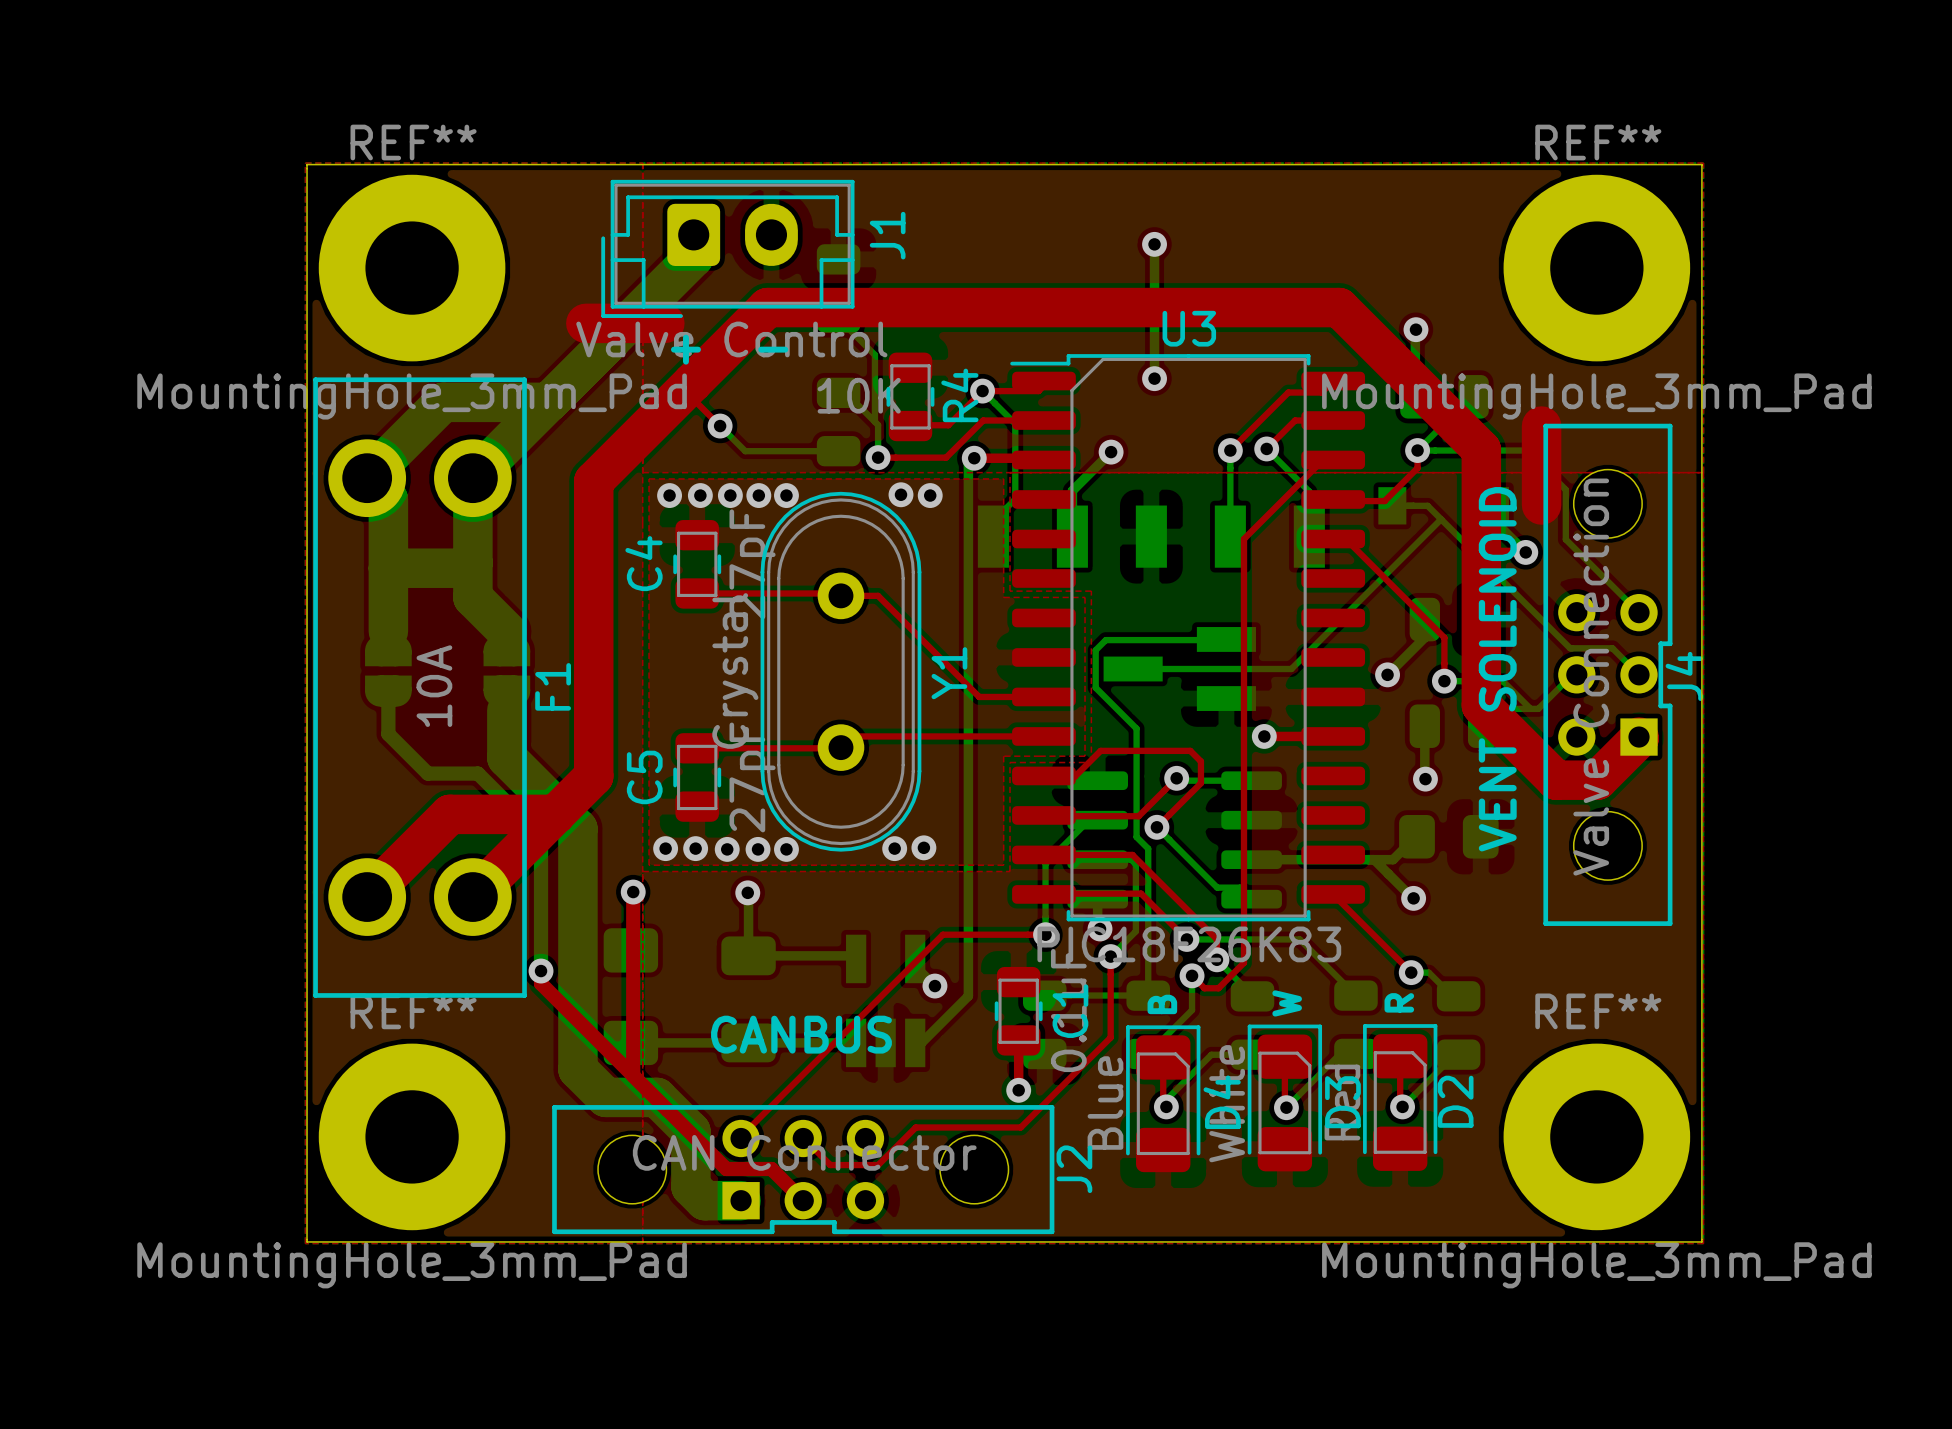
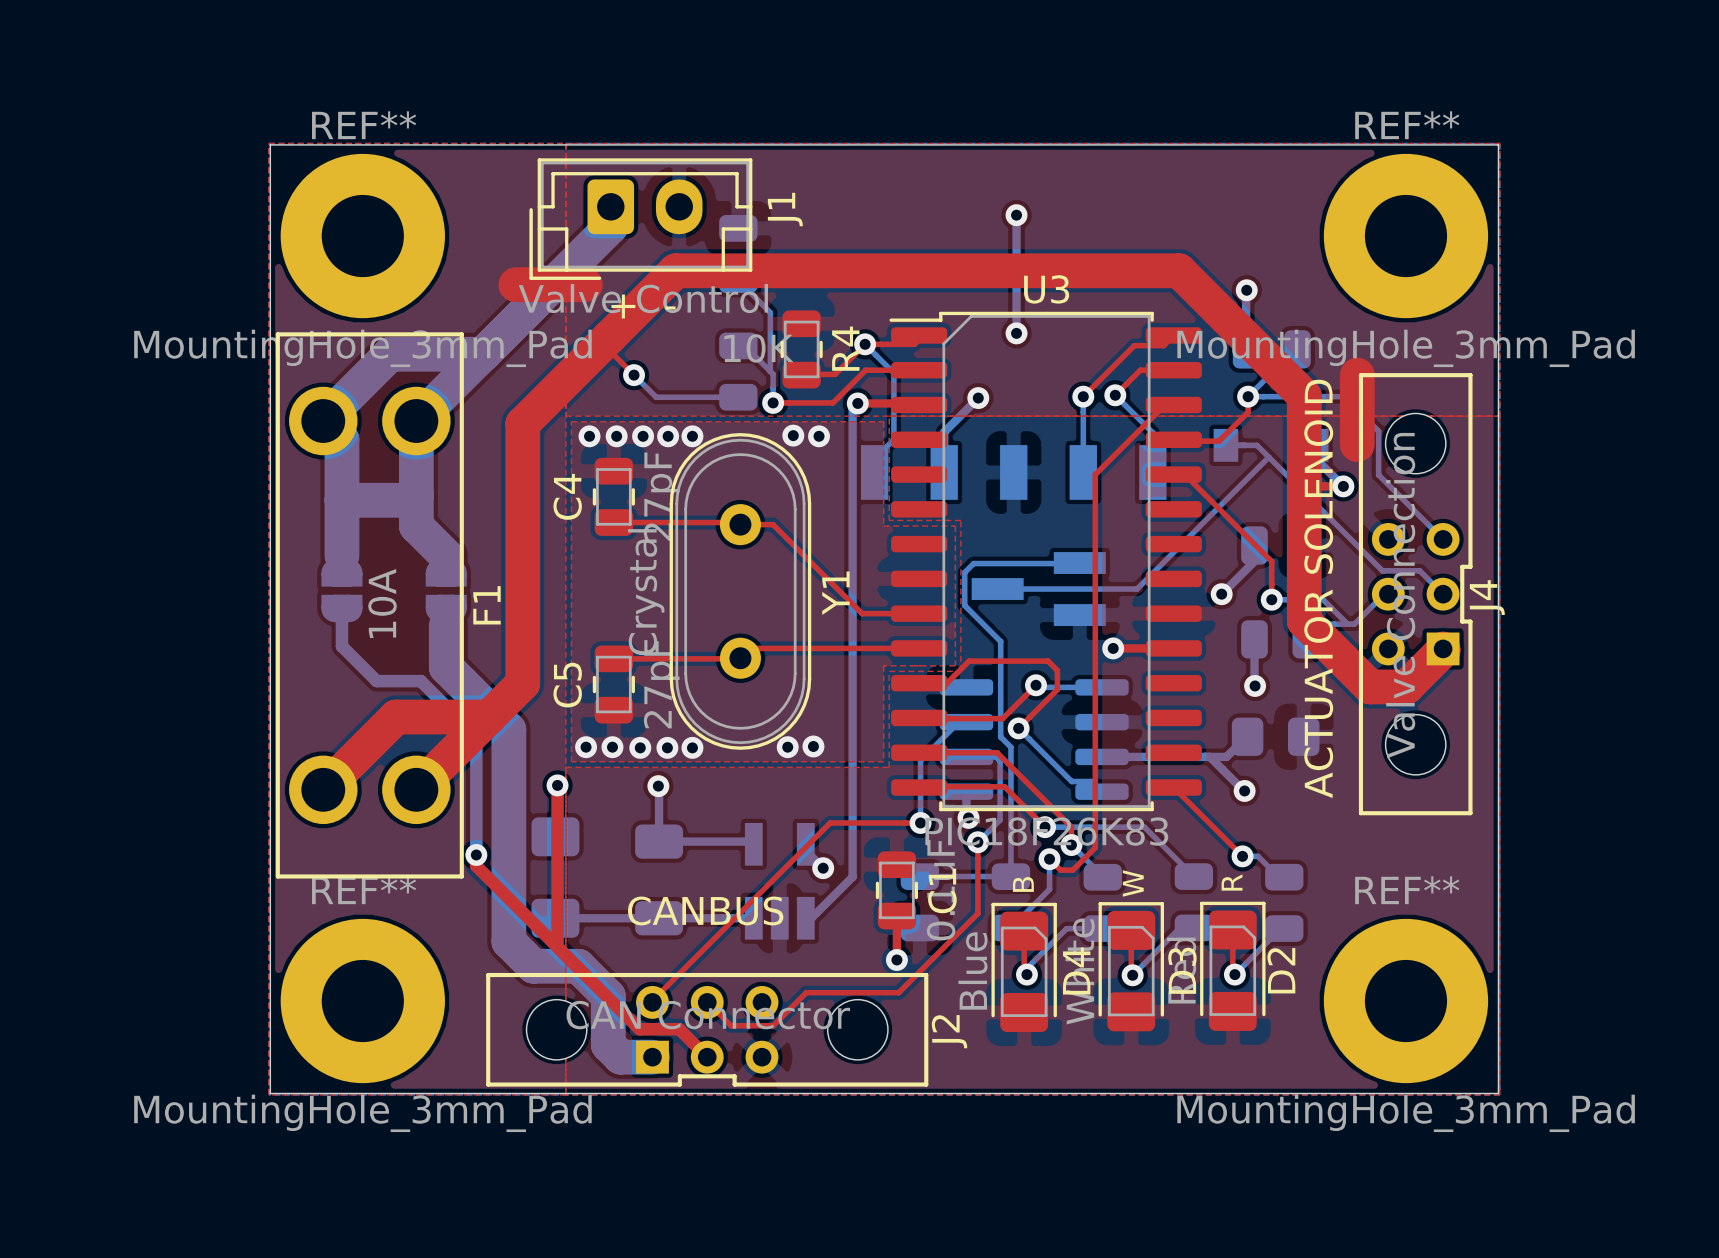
text: VENT SOLENOID (1497, 669) -> ACTUATOR SOLENOID (1318, 588)

